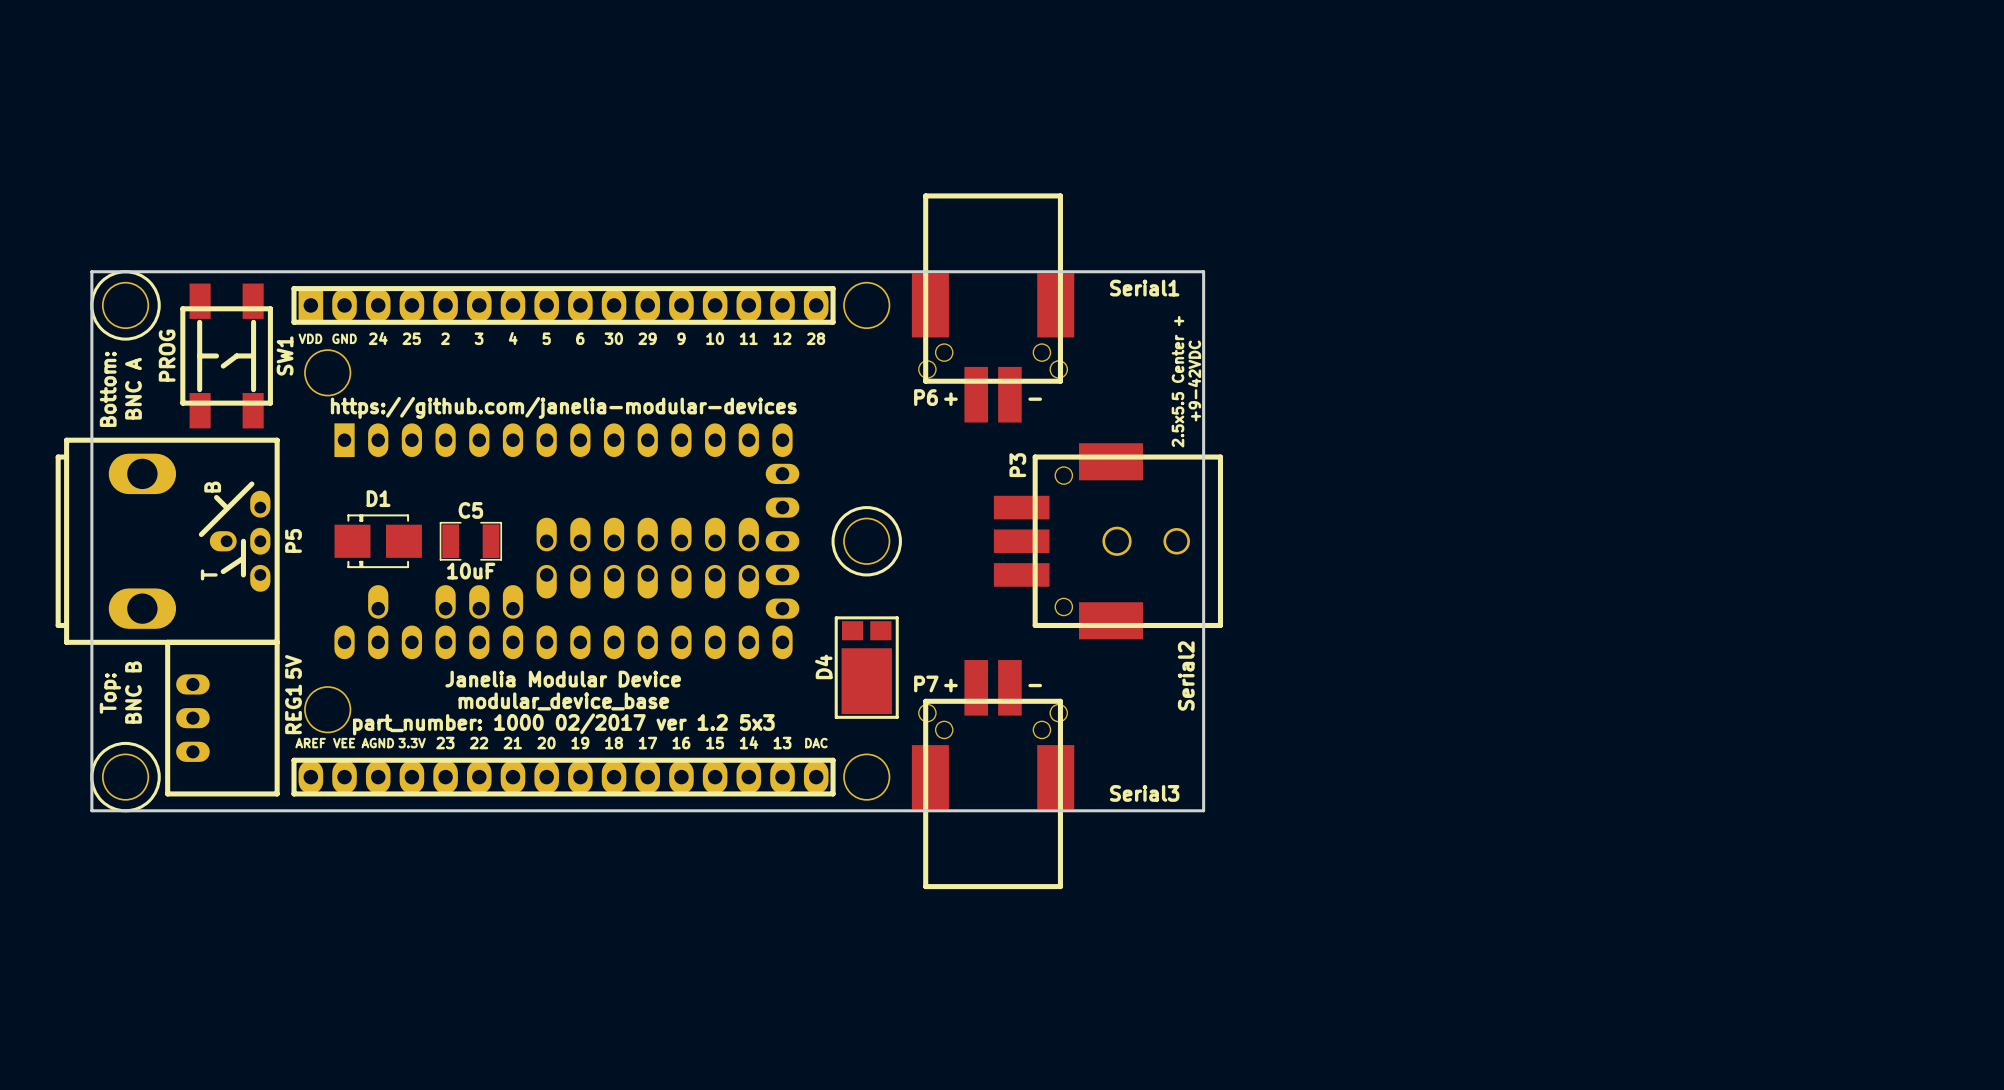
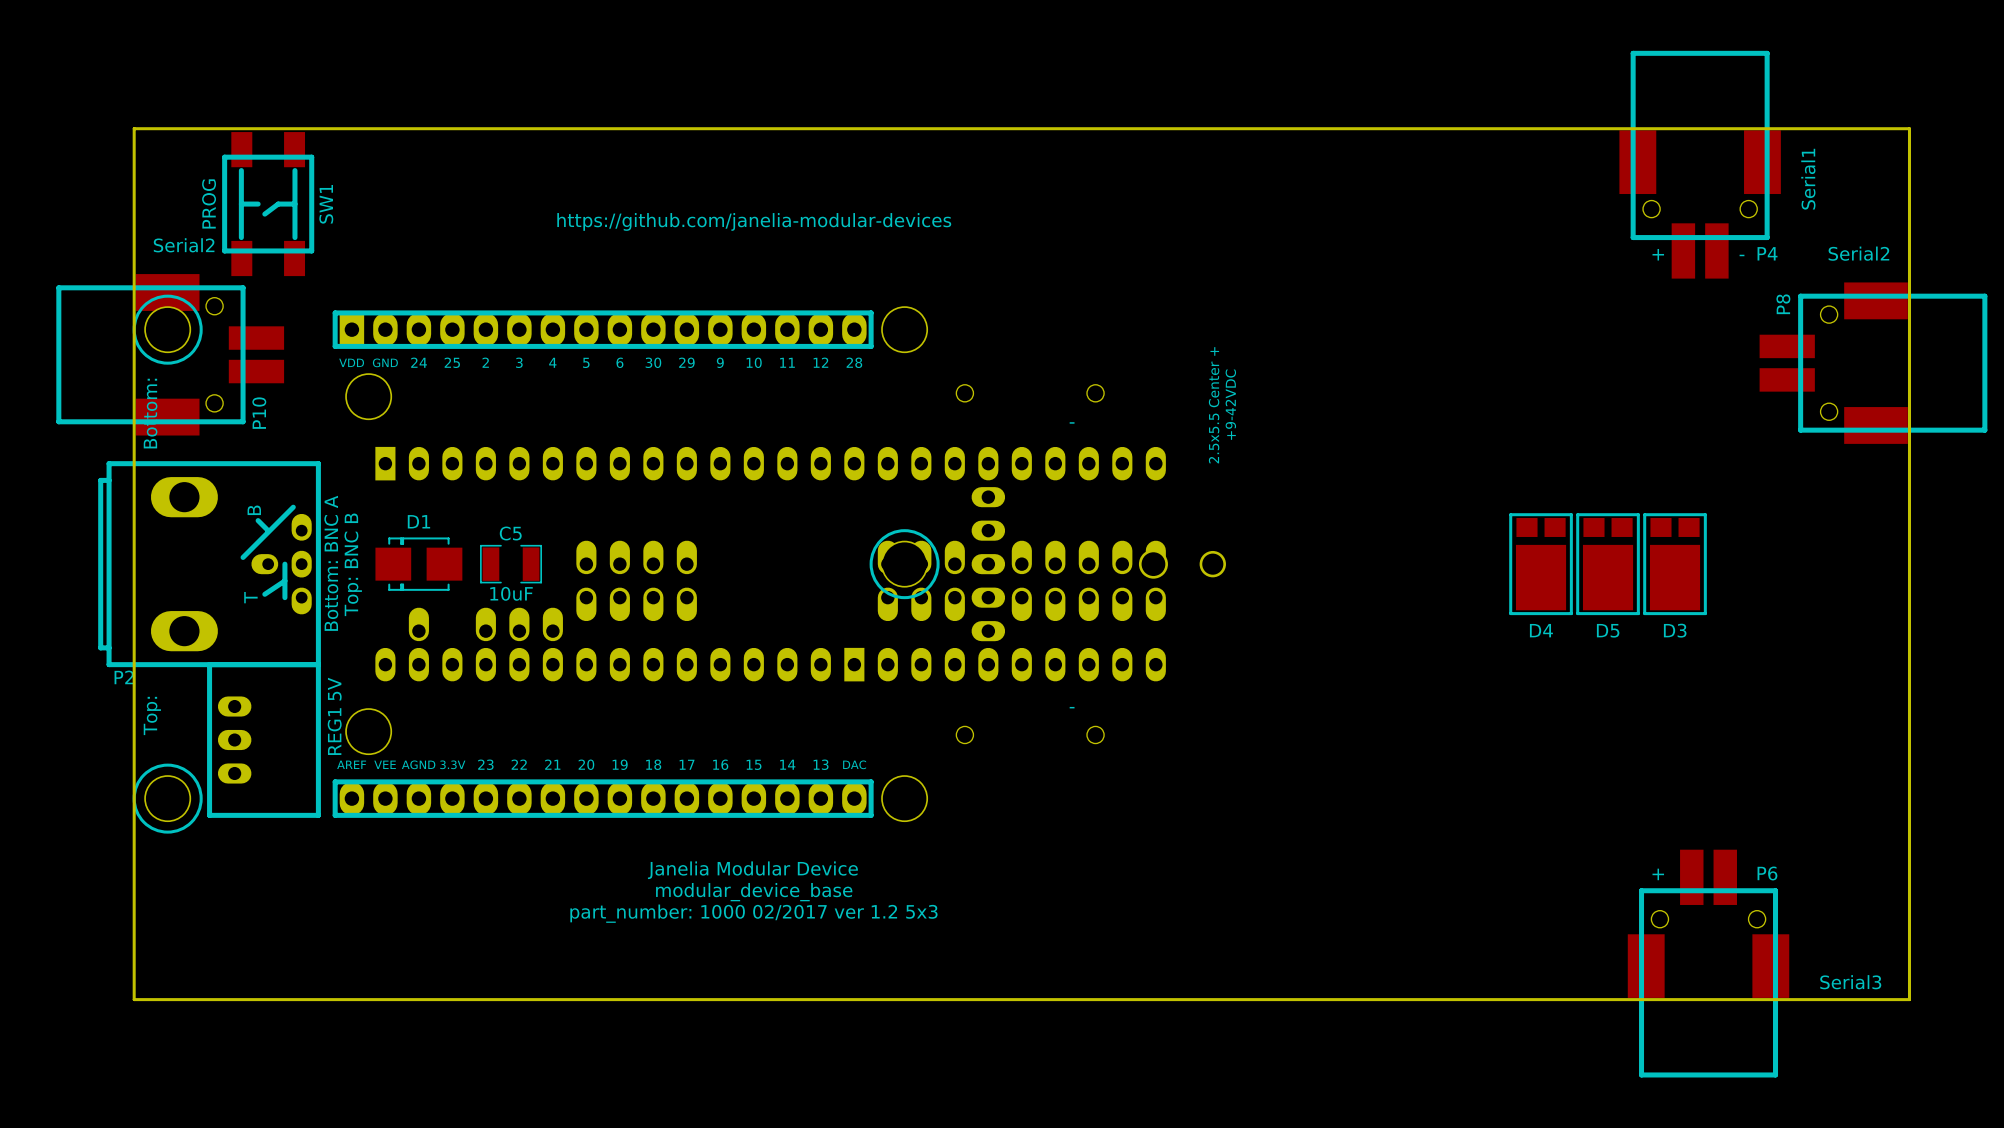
P4: none -> (1700, 164)
text: none -> Serial1 (1808, 179)
text: none -> Serial2 (184, 245)
text: none -> Serial2 (1858, 253)
text: none -> + (1658, 254)
text: none -> - (1742, 255)
board edge: (91, 271) (1203, 271) (1203, 810) (91, 810) -> (134, 296) (134, 128) (1909, 128) (1909, 999) (134, 999) (134, 832)
text: Serial1 (1144, 288) -> none
P6 rotation: 0° (993, 307) -> 180° (1708, 963)
P6 position: (993, 307) -> (1708, 963)
P10: none -> (170, 354)
P8: none -> (1873, 363)
SW1 position: (226, 355) -> (268, 204)
P5 text: BNC A (133, 388) -> none
text: + (950, 399) -> none
text position: https://github.com/janelia-modular-devices (563, 407) -> https://github.com/janelia-modular-devices (754, 221)
P5 text: none -> Bottom: BNC A (331, 563)
P5 name: P5 (293, 540) -> P2 (124, 677)
P5 text: none -> Top: BNC B (353, 564)
part: (566, 541) -> none
part: none -> (770, 564)
P3: (1108, 541) -> none
D5: none -> (1608, 564)
D3: none -> (1675, 564)
D4 name rotation: 0° (823, 666) -> 90° clockwise (1541, 630)
D4 name position: D4 (823, 666) -> D4 (1541, 630)
D4 position: (866, 667) -> (1541, 564)
text: Serial2 (1186, 676) -> none
text position: Janelia Modular Device (563, 679) -> Janelia Modular Device (752, 870)
text: + (950, 685) -> none
P5 text: BNC B (133, 692) -> none
text position: modular_device_base (563, 701) -> modular_device_base (754, 892)
text position: part_number: 1000 02/2017 ver 1.2 5x3 (563, 724) -> part_number: 1000 02/2017 ver 1.2 5x3 (753, 913)
P7: (993, 774) -> none
text: Serial3 (1144, 793) -> none
text: none -> + (1658, 874)
text: none -> Serial3 (1850, 982)

